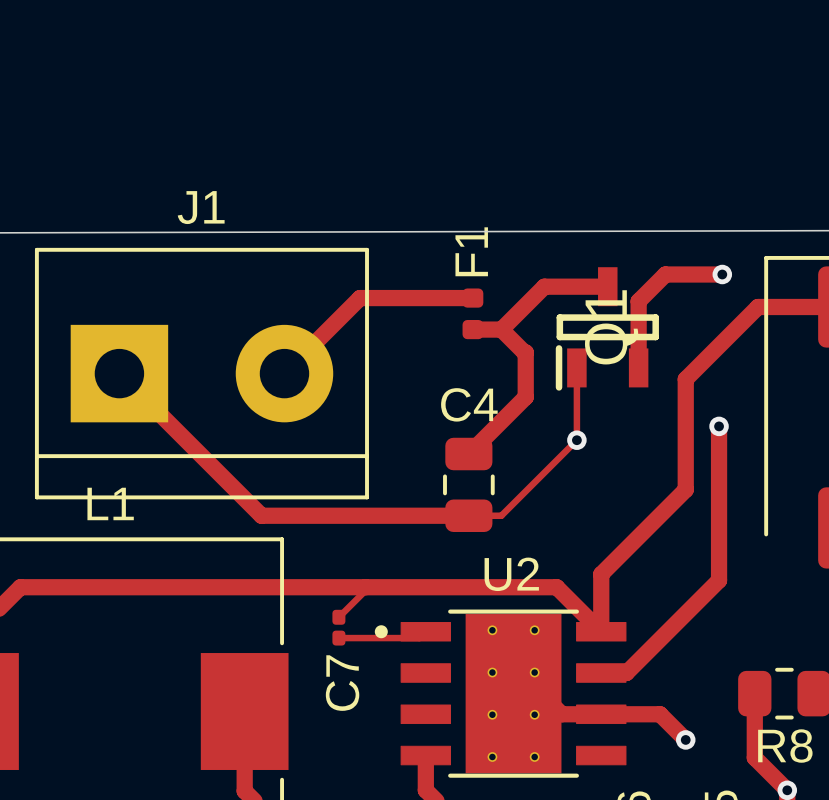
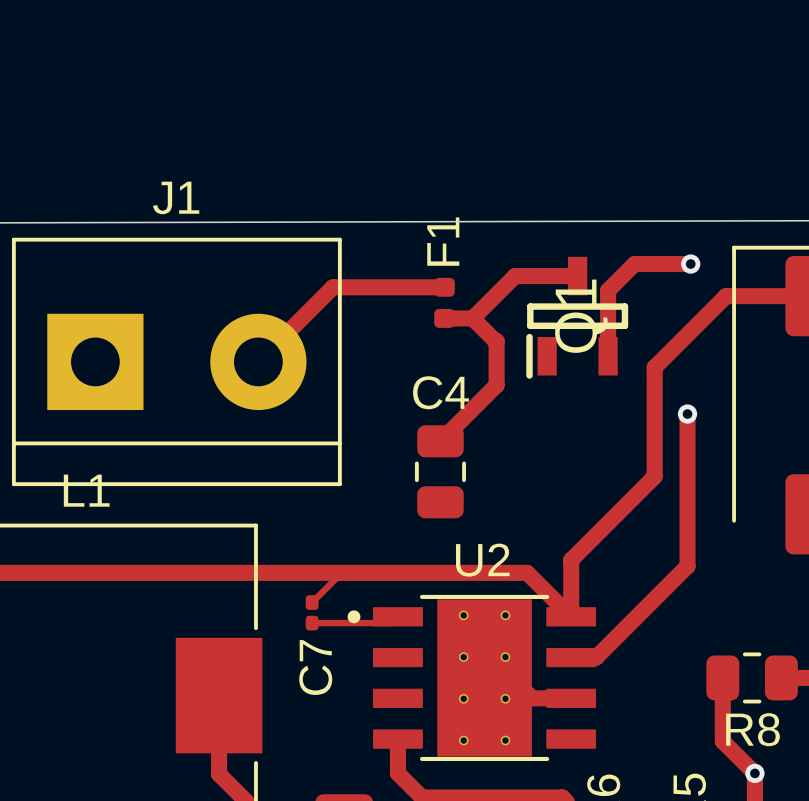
track: (576, 367) (576, 440) (501, 515) (261, 515) (119, 373) -> none
via: (576, 440) -> none
track: (601, 714) (660, 714) (685, 739) -> none
via: (685, 739) -> none

